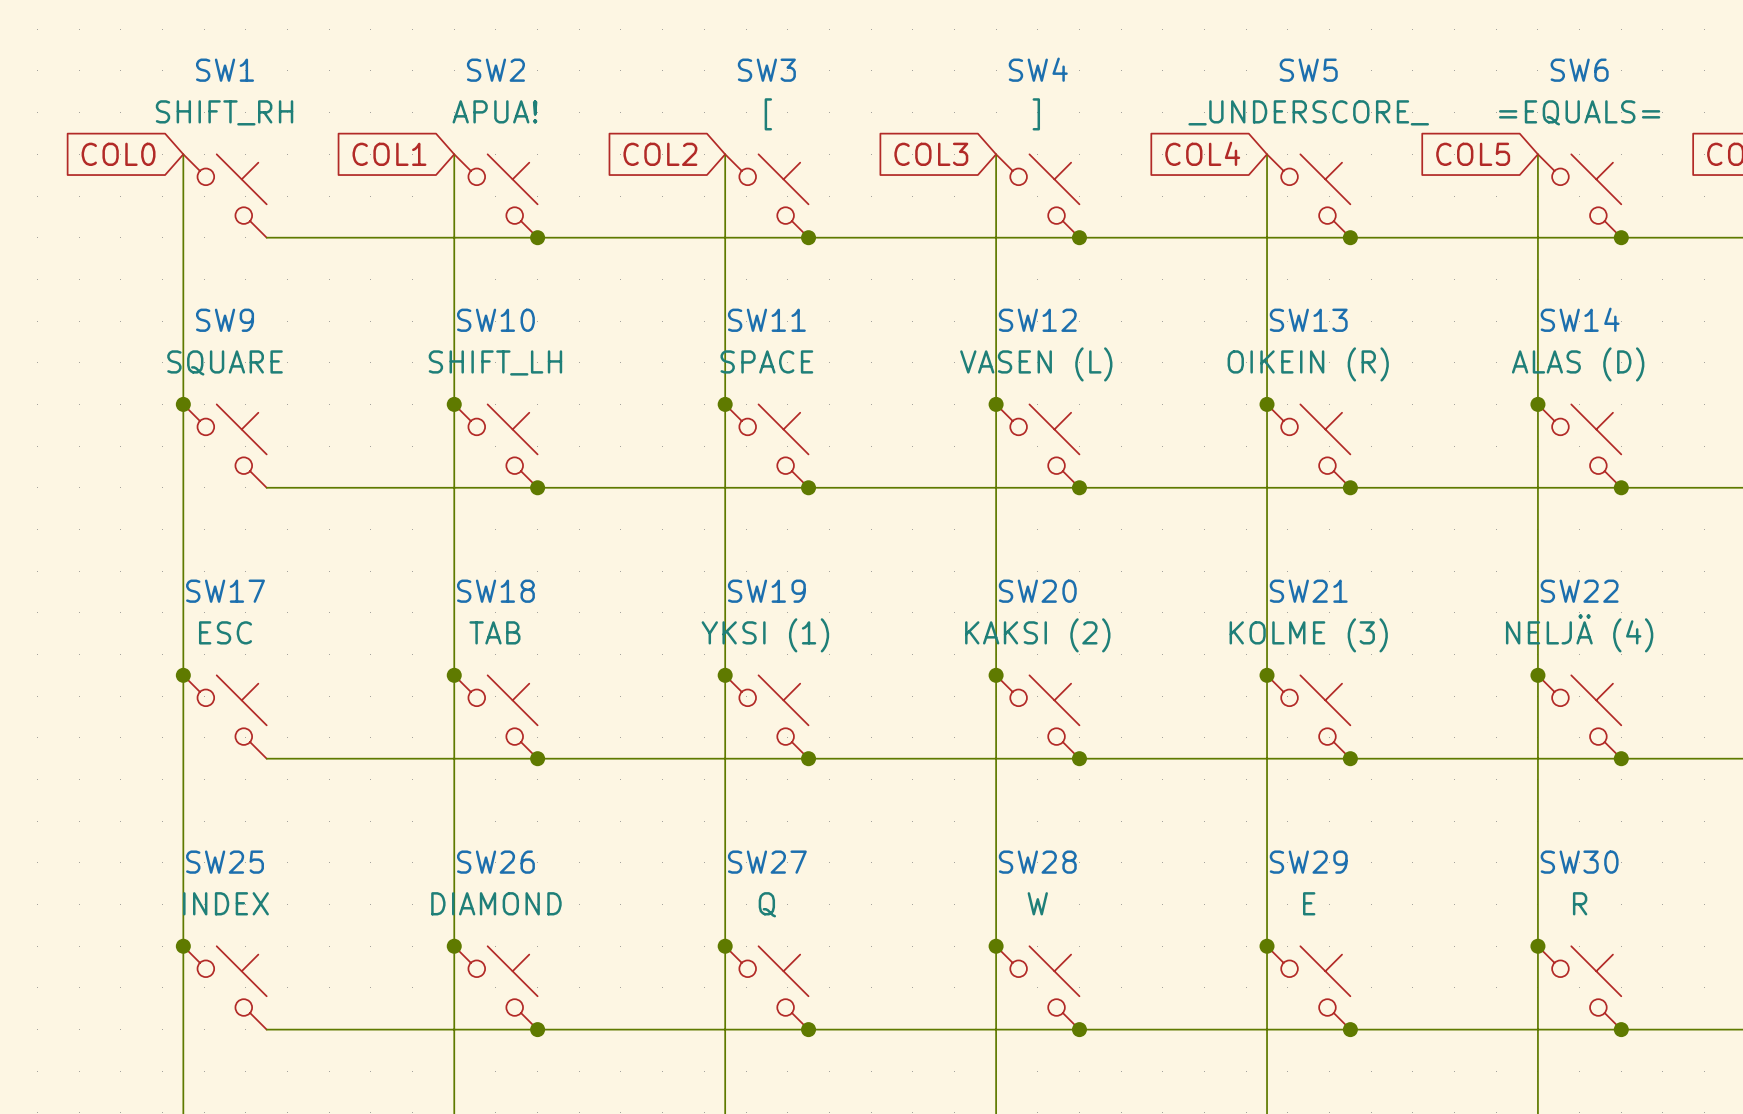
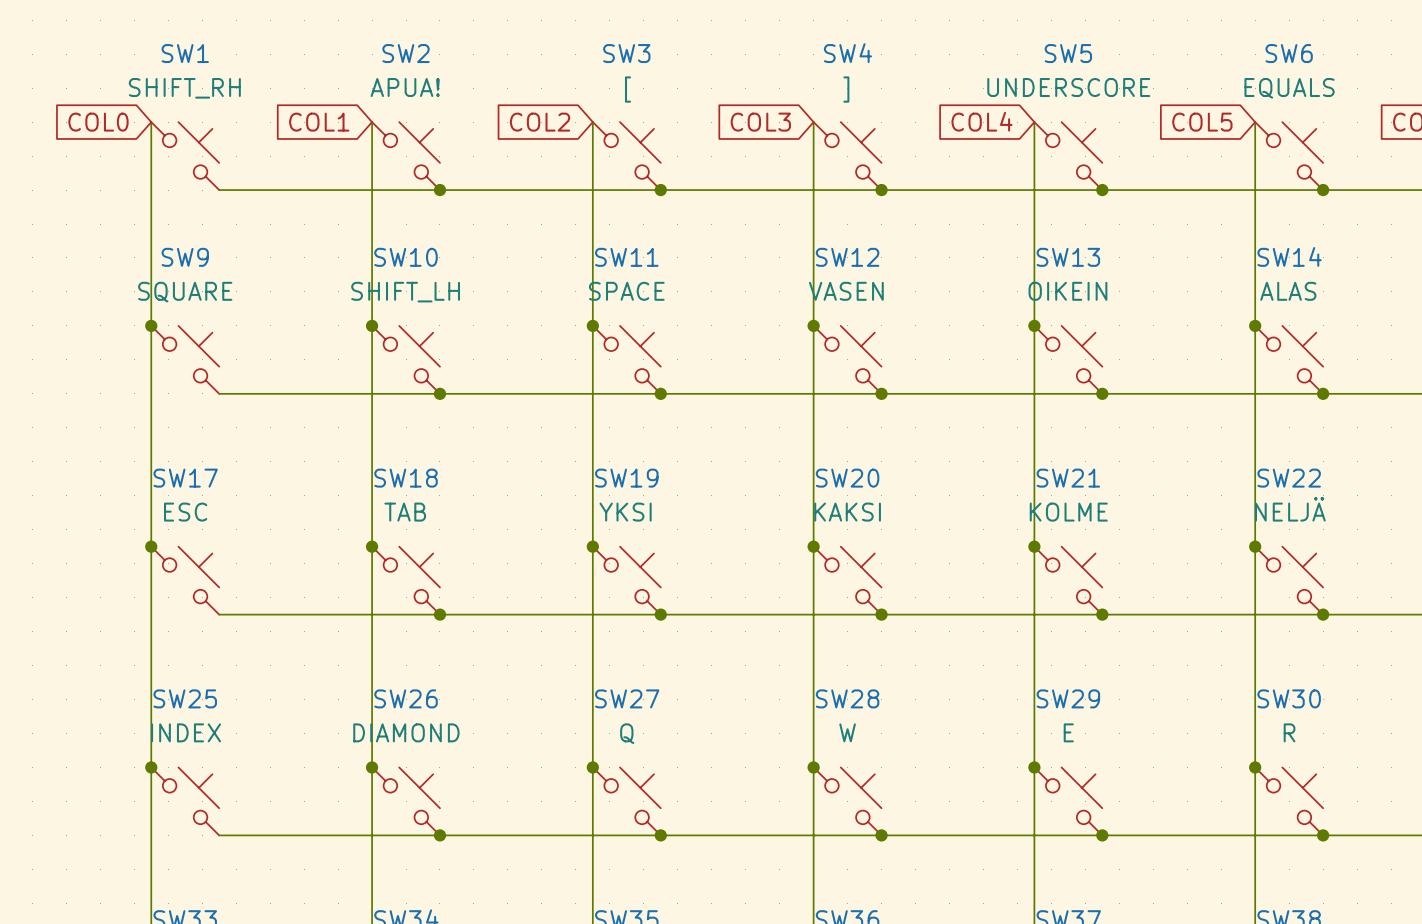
SW5 value: _UNDERSCORE_ (1308, 112) -> UNDERSCORE (1068, 87)
SW6 value: =EQUALS= (1579, 112) -> EQUALS (1289, 88)
SW12 value: VASEN (L) (1036, 364) -> VASEN (846, 291)
SW13 value: OIKEIN (R) (1308, 364) -> OIKEIN (1067, 291)
SW14 value: ALAS (D) (1578, 364) -> ALAS (1288, 291)
SW22 value: NELJÄ (4) (1579, 633) -> NELJÄ (1290, 509)
SW19 value: YKSI (1) (765, 635) -> YKSI (625, 512)
SW20 value: KAKSI (2) (1037, 635) -> KAKSI (847, 512)
SW21 value: KOLME (3) (1308, 635) -> KOLME (1068, 512)

